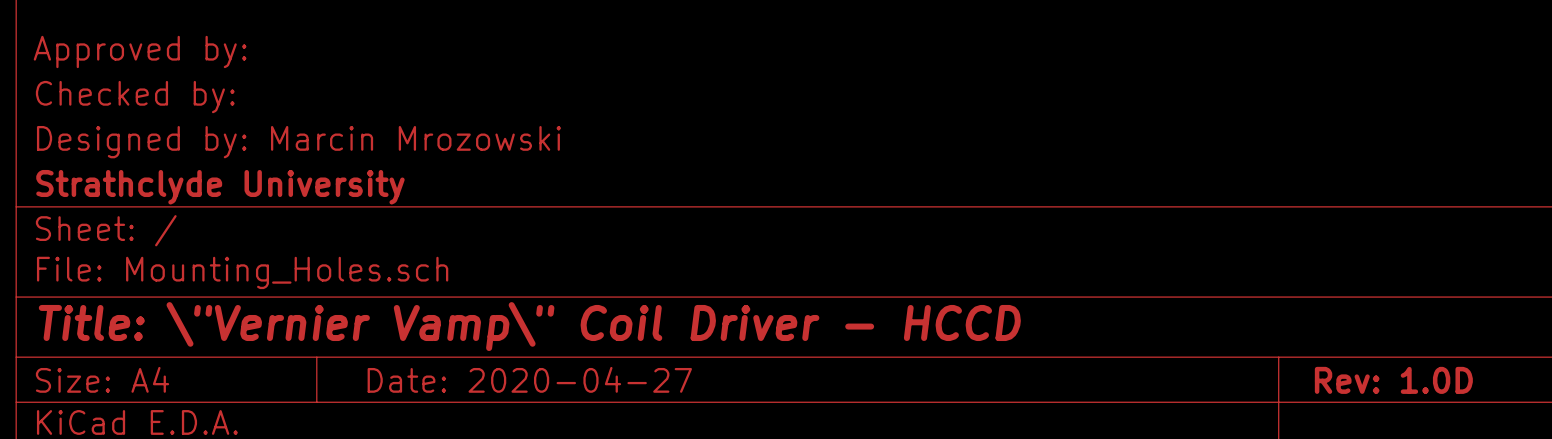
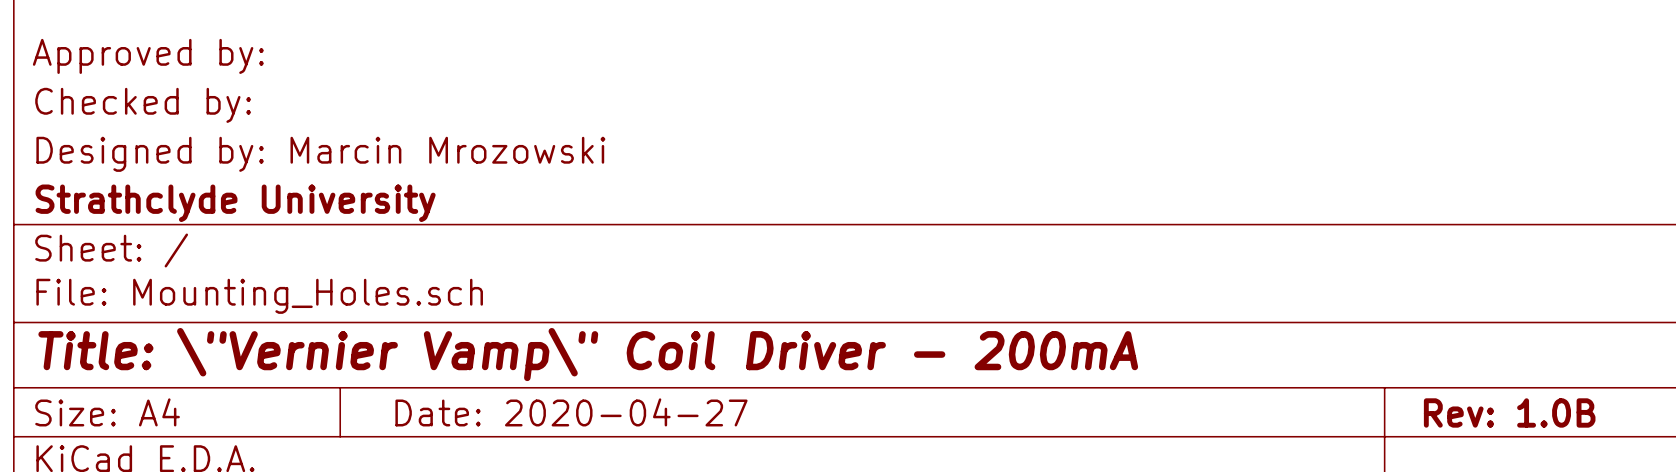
title block: Title: \"Vernier Vamp\" Coil Driver - HCCD (529, 326) -> Title: \"Vernier Vamp\" Coil Driver - 200mA (588, 354)
title block: Rev: 1.0D (1393, 380) -> Rev: 1.0B (1509, 412)

